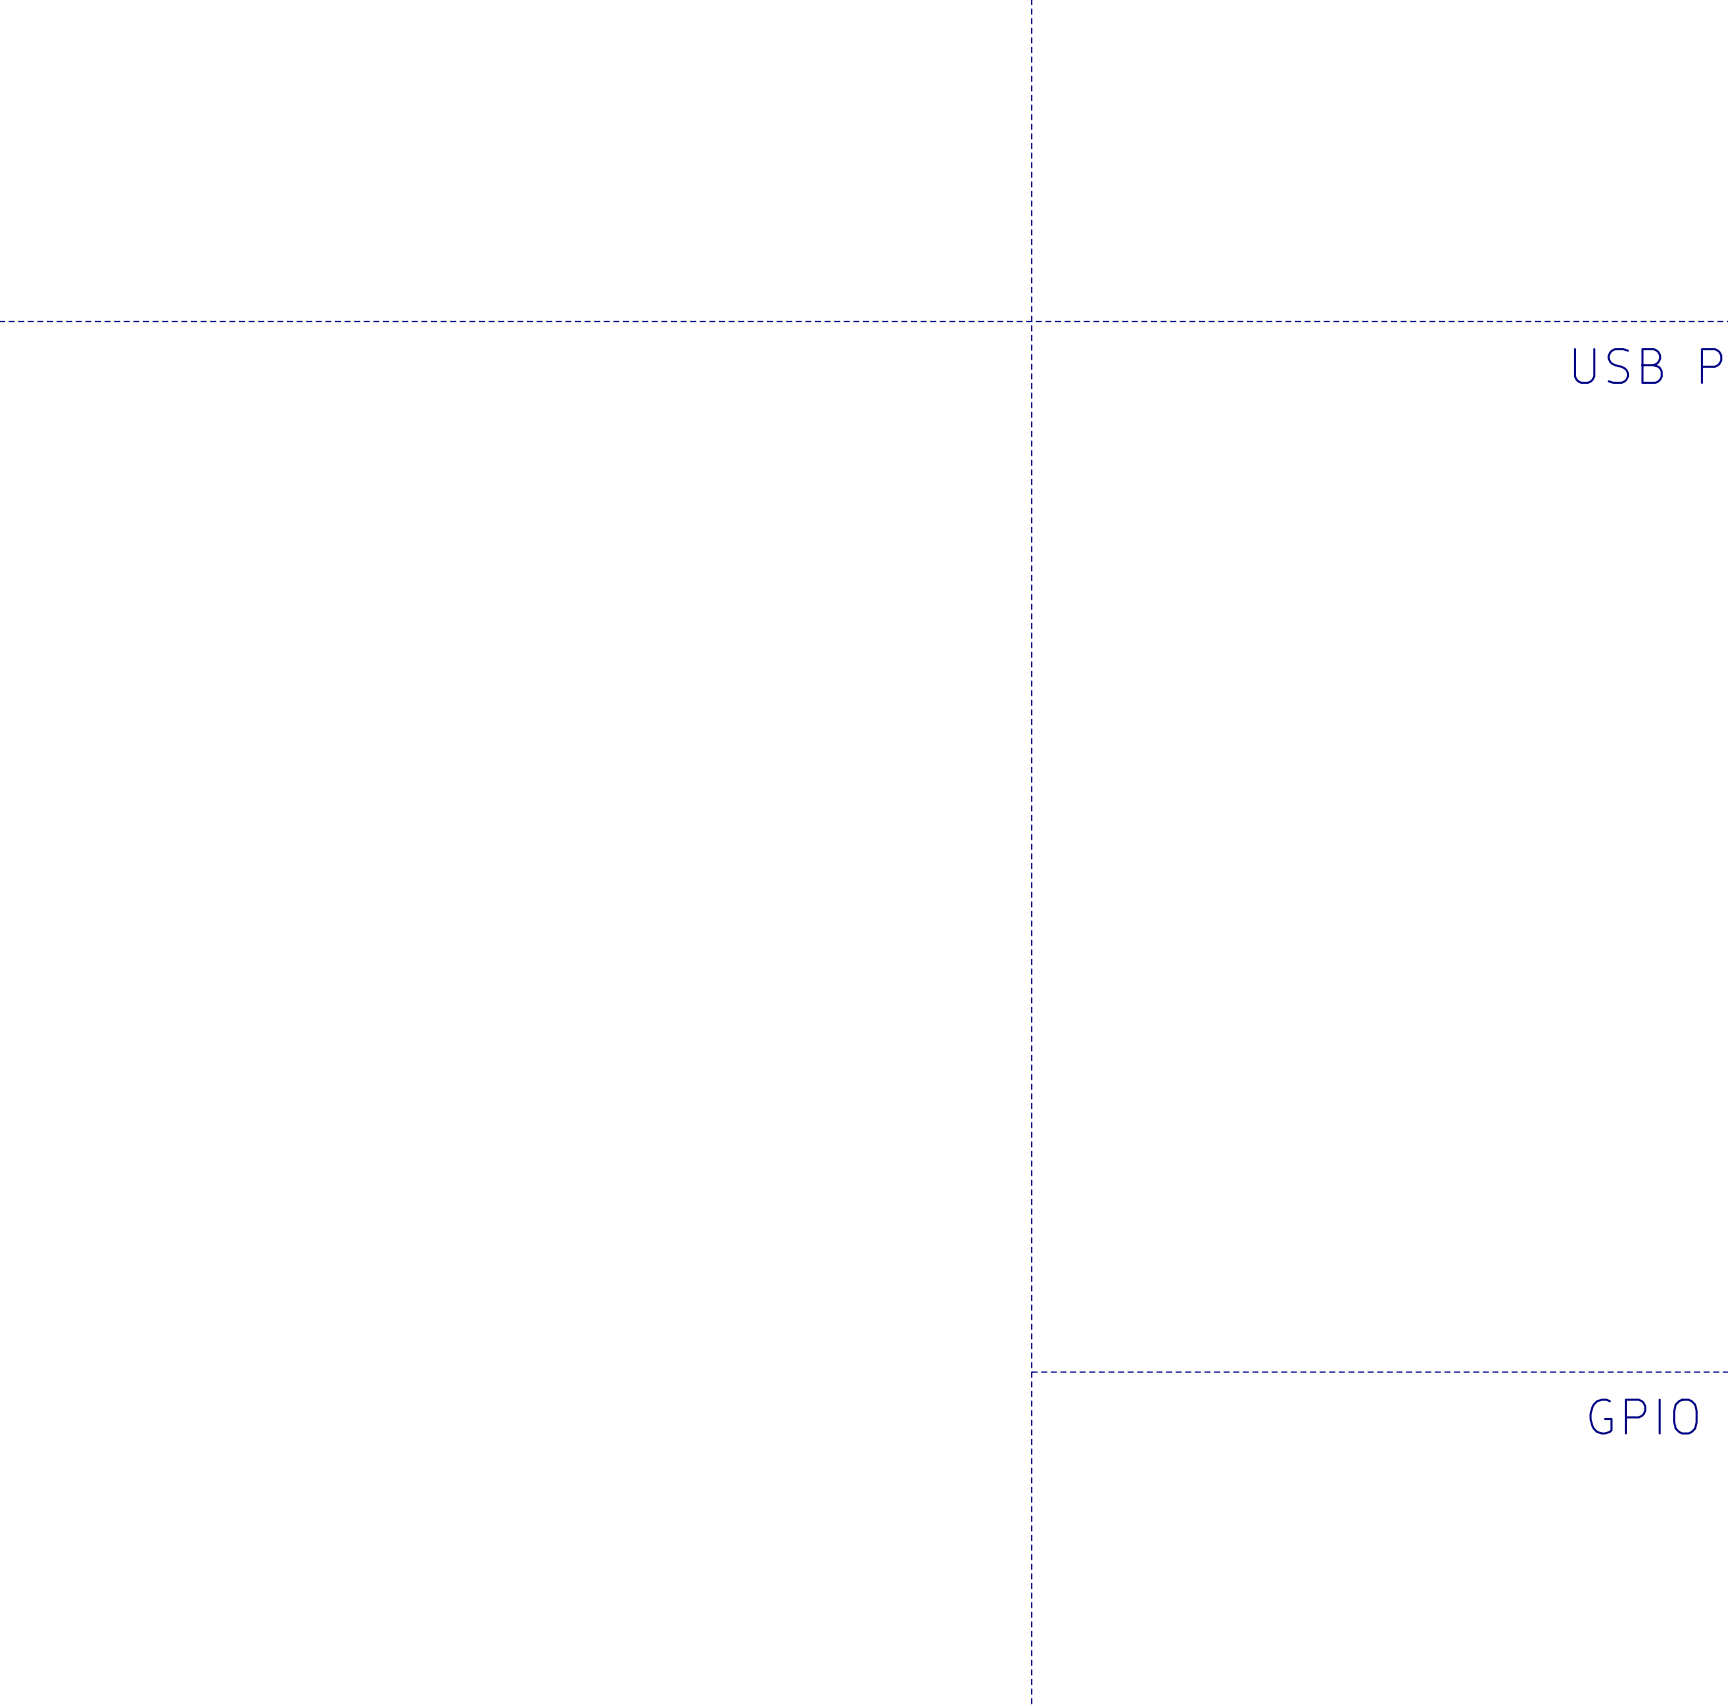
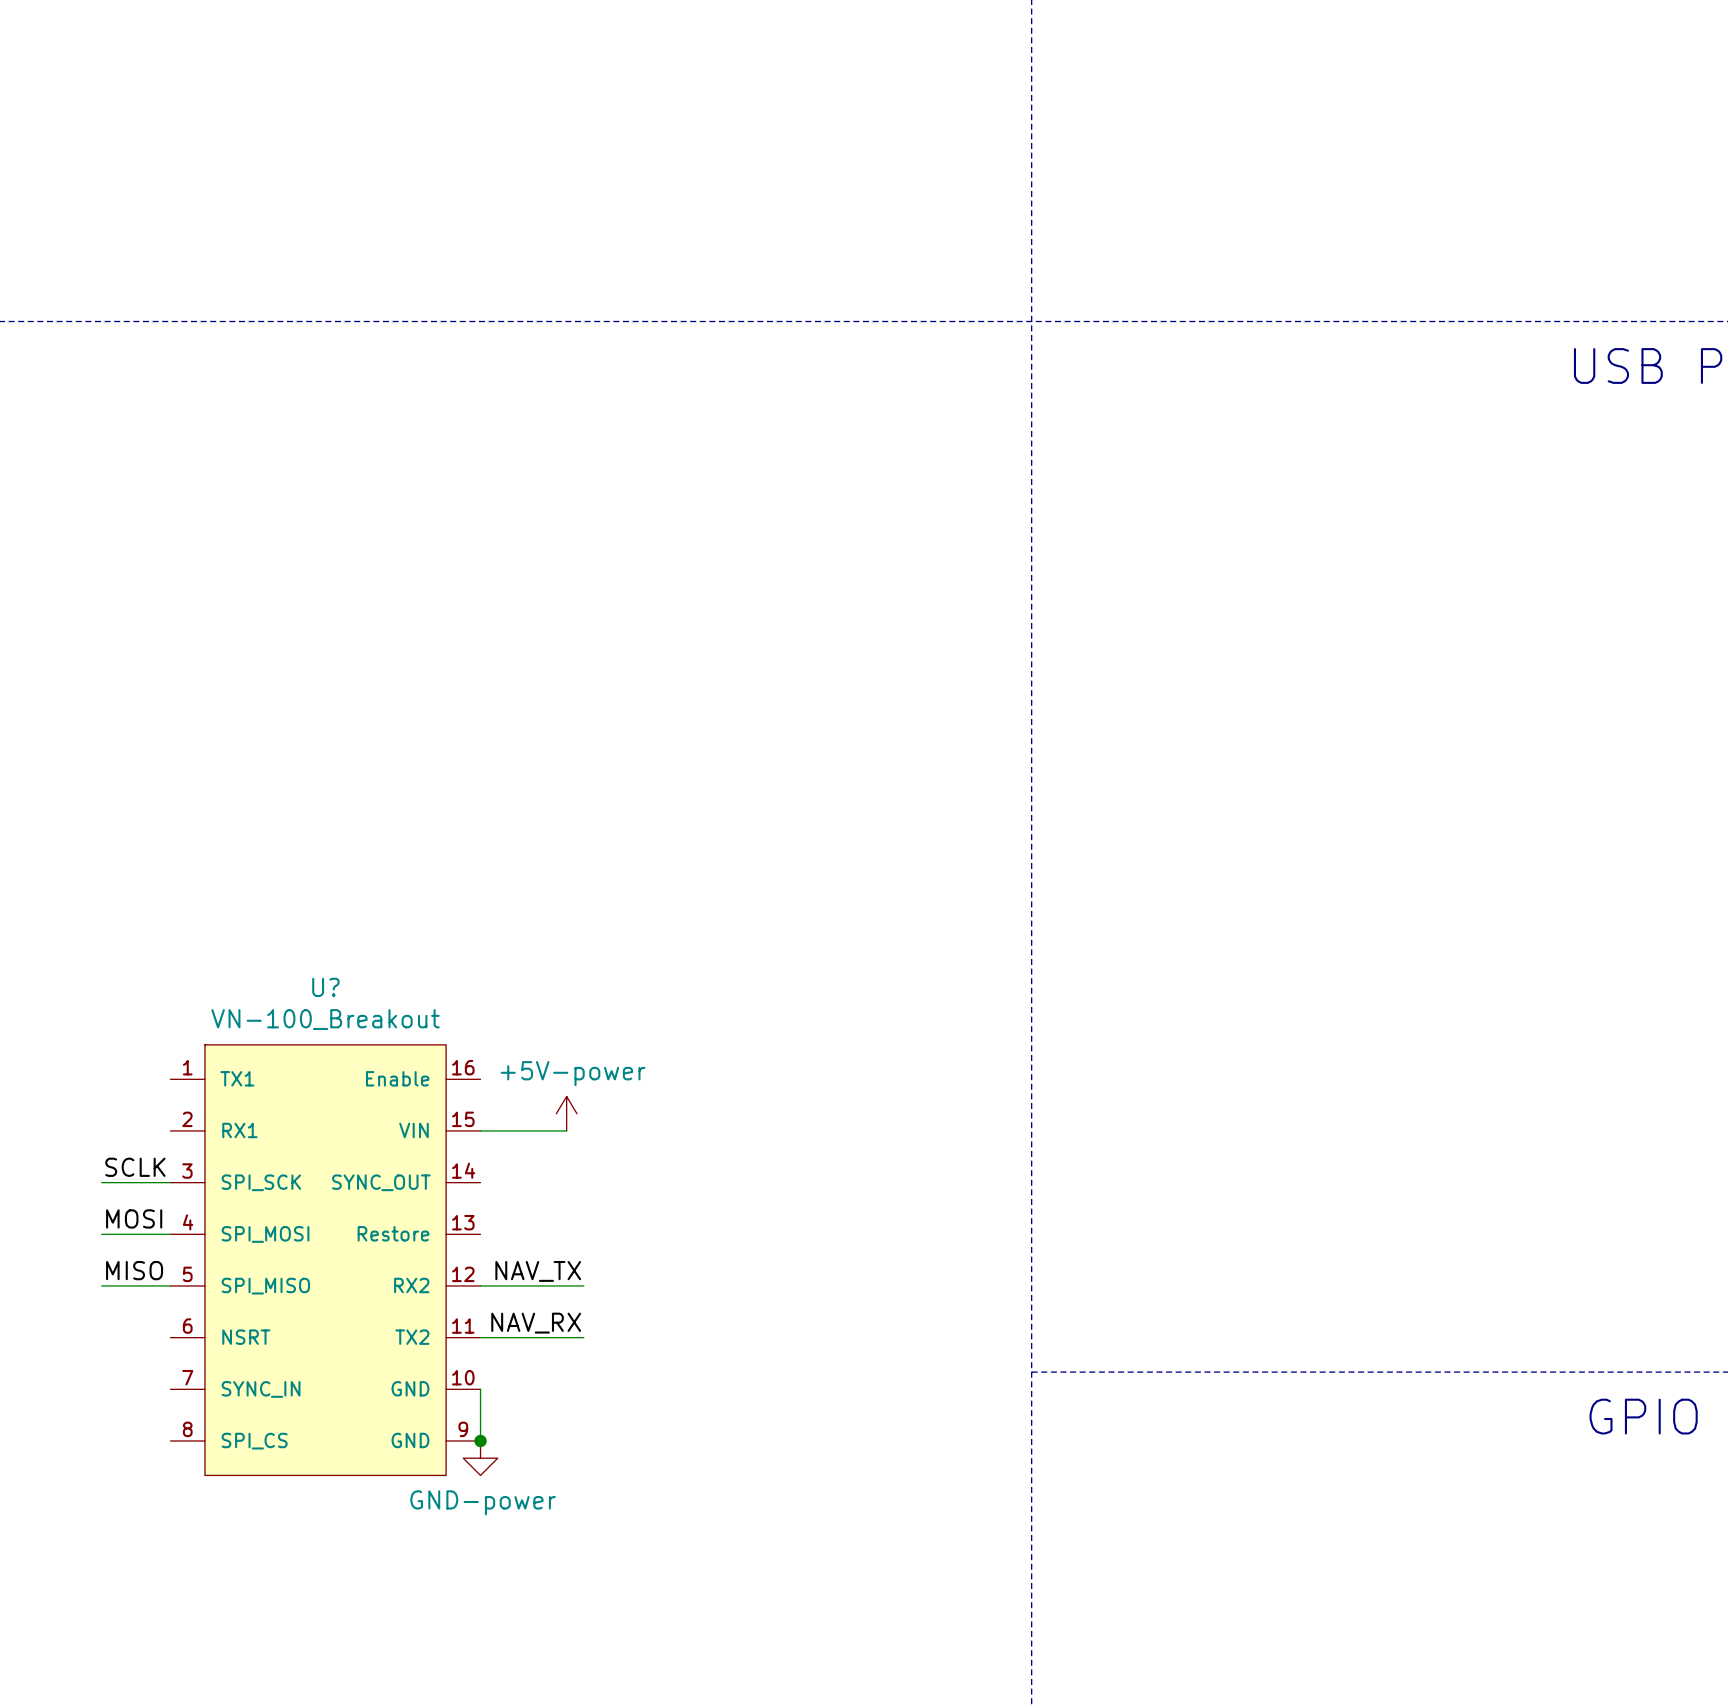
power symbol: none -> +5V-power (566, 1113)
wire: none -> (480, 1130) (566, 1130)
label: none -> SCLK (135, 1167)
wire: none -> (101, 1182) (170, 1182)
label: none -> MOSI (134, 1218)
wire: none -> (101, 1234) (170, 1234)
U?: none -> VN-100_Breakout (325, 1260)
label: none -> MISO (134, 1270)
label: none -> NAV_TX (538, 1271)
wire: none -> (101, 1285) (170, 1285)
wire: none -> (480, 1285) (583, 1285)
label: none -> NAV_RX (536, 1323)
wire: none -> (480, 1337) (583, 1337)
wire: none -> (480, 1389) (480, 1440)
junction: none -> (480, 1440)
power symbol: none -> GND-power (480, 1458)

